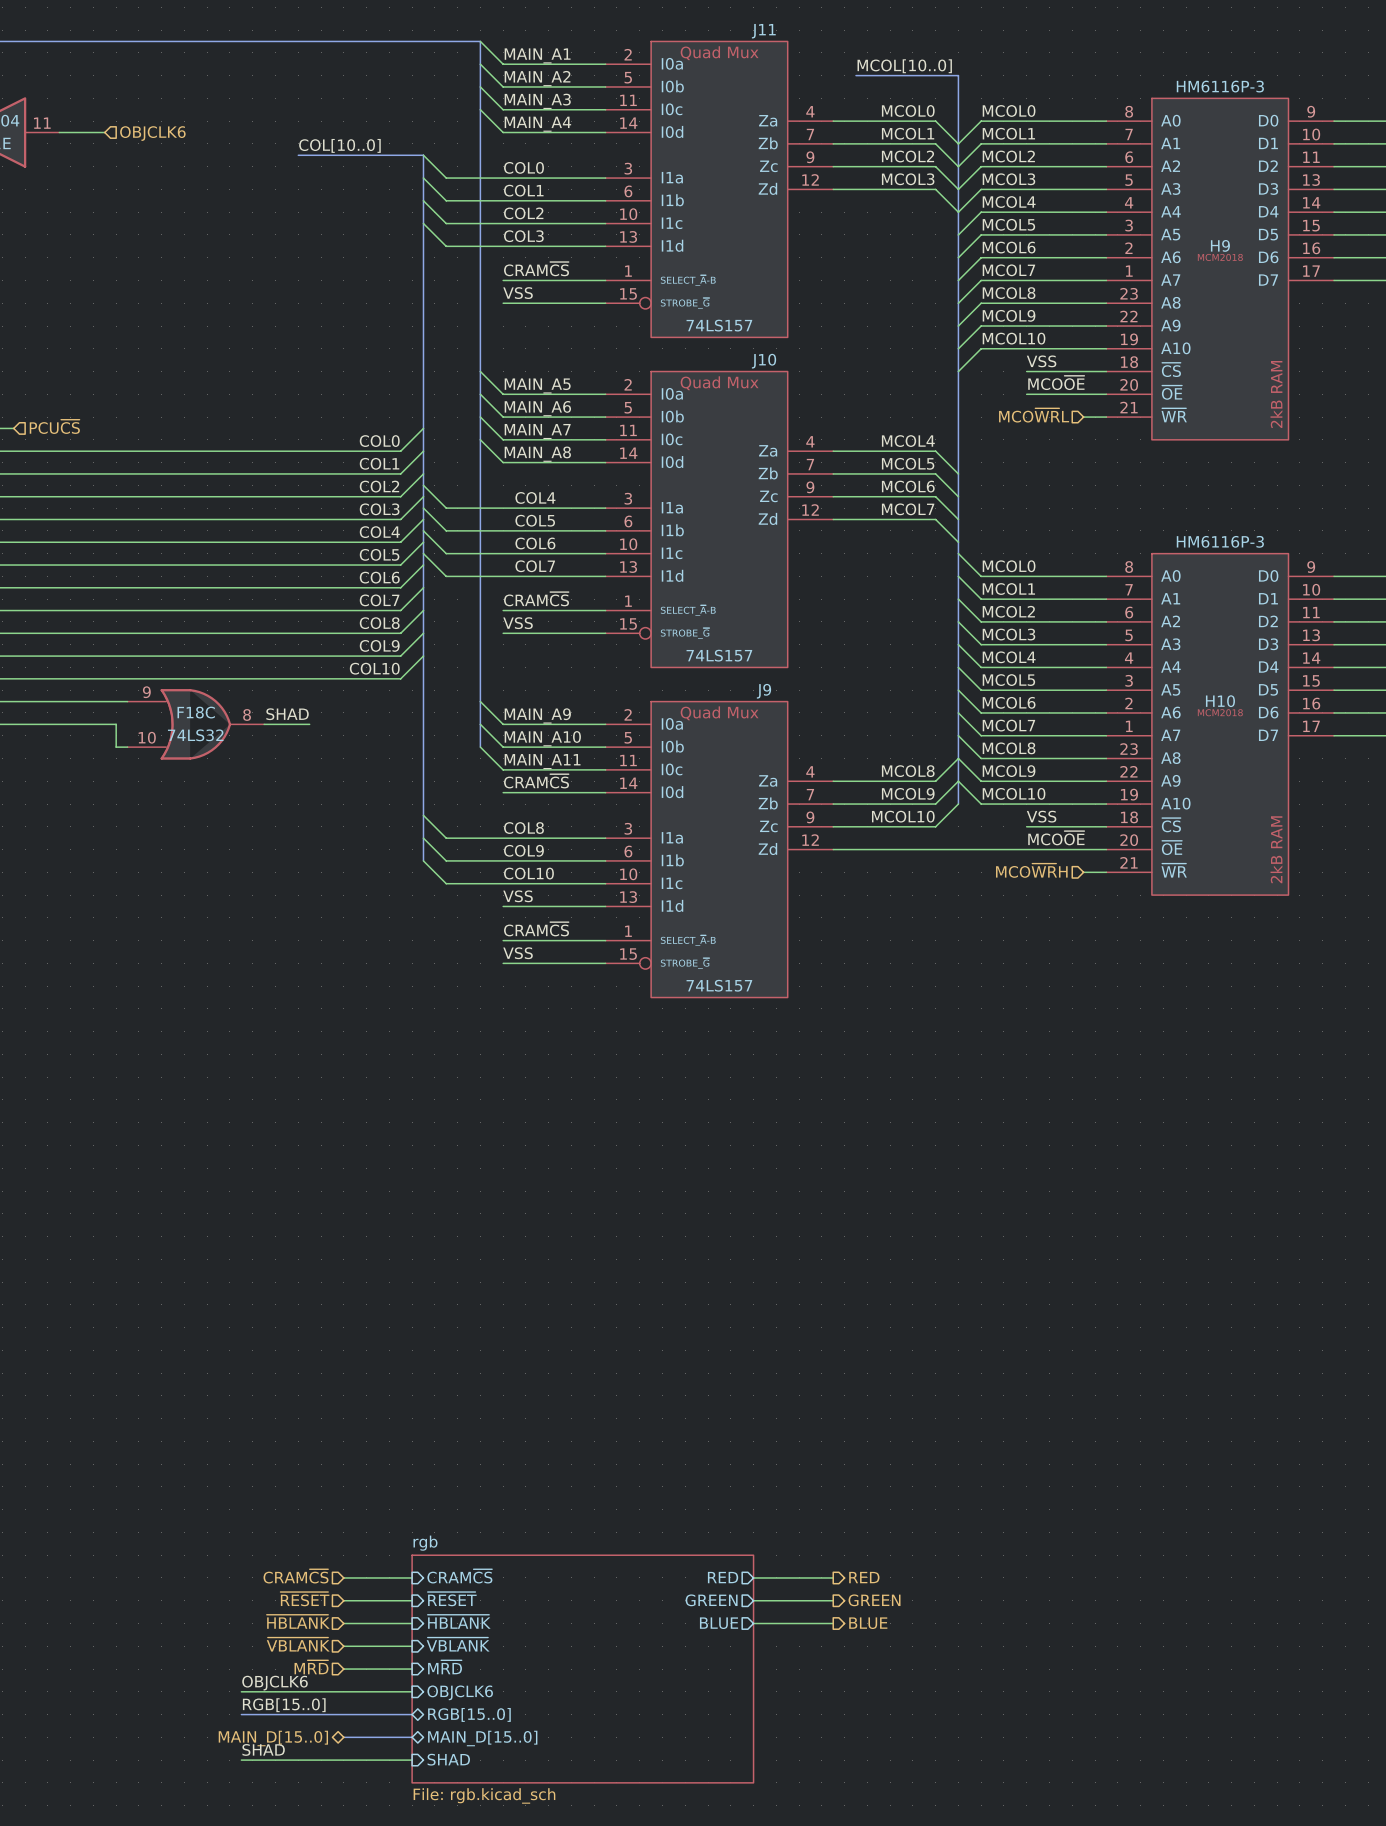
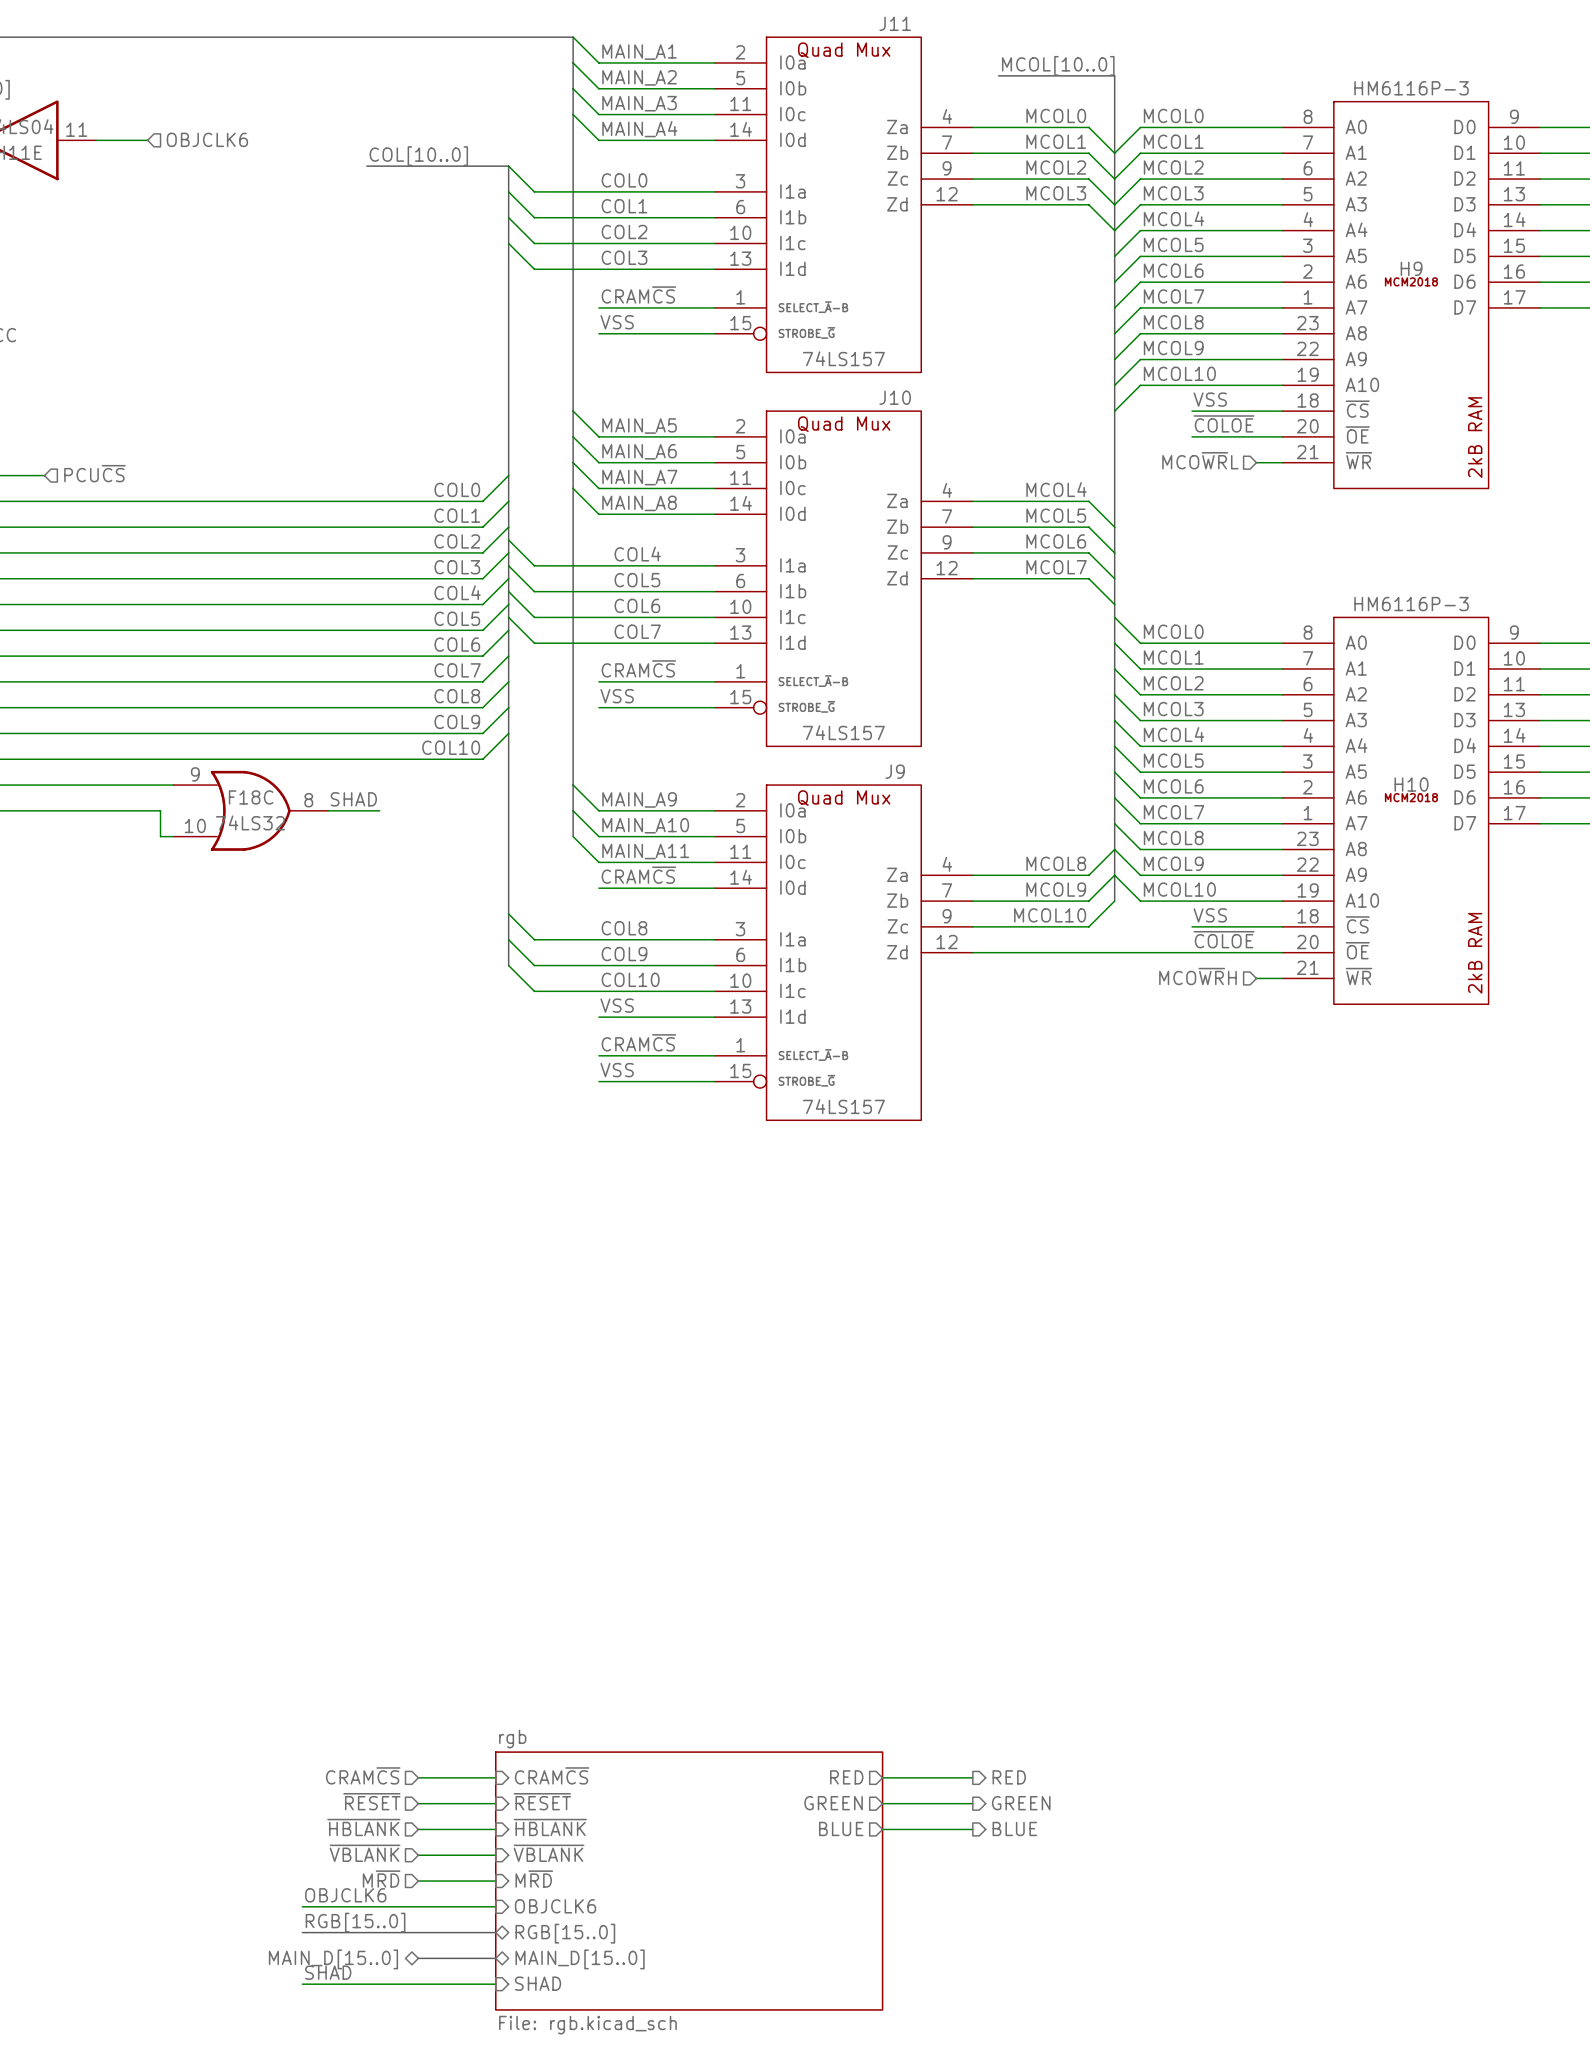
label: MCO~{OE} (1056, 382) -> ~{COLOE} (1224, 423)
label: MCO~{OE} (1056, 838) -> ~{COLOE} (1224, 939)

